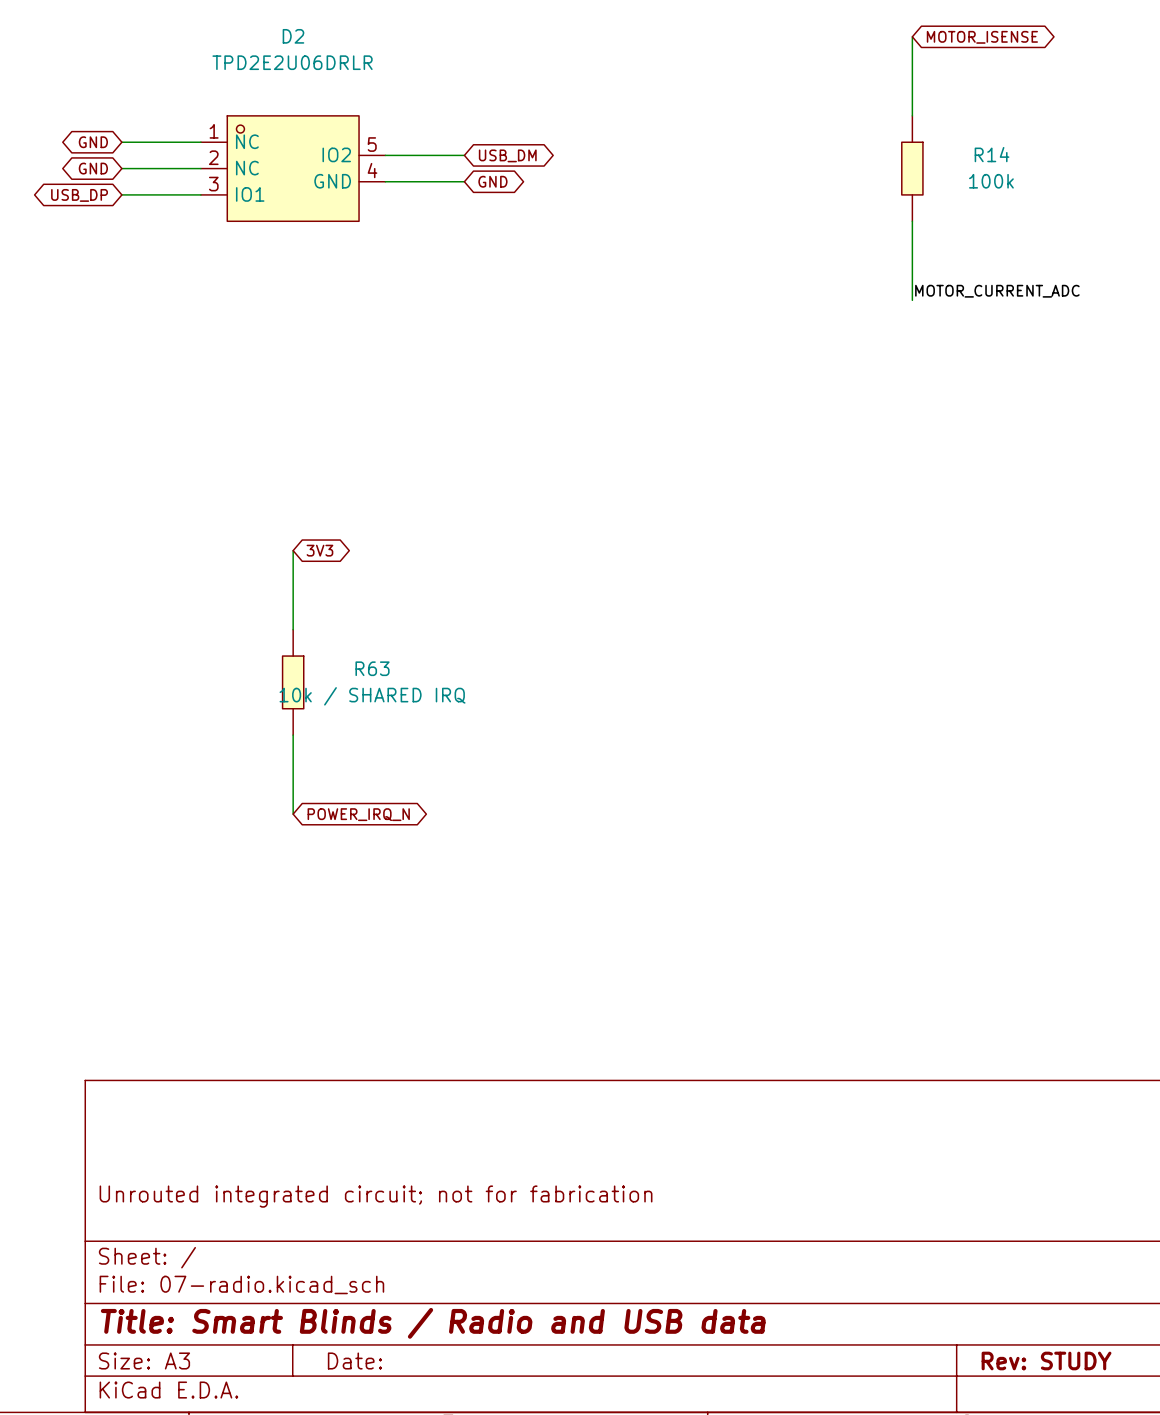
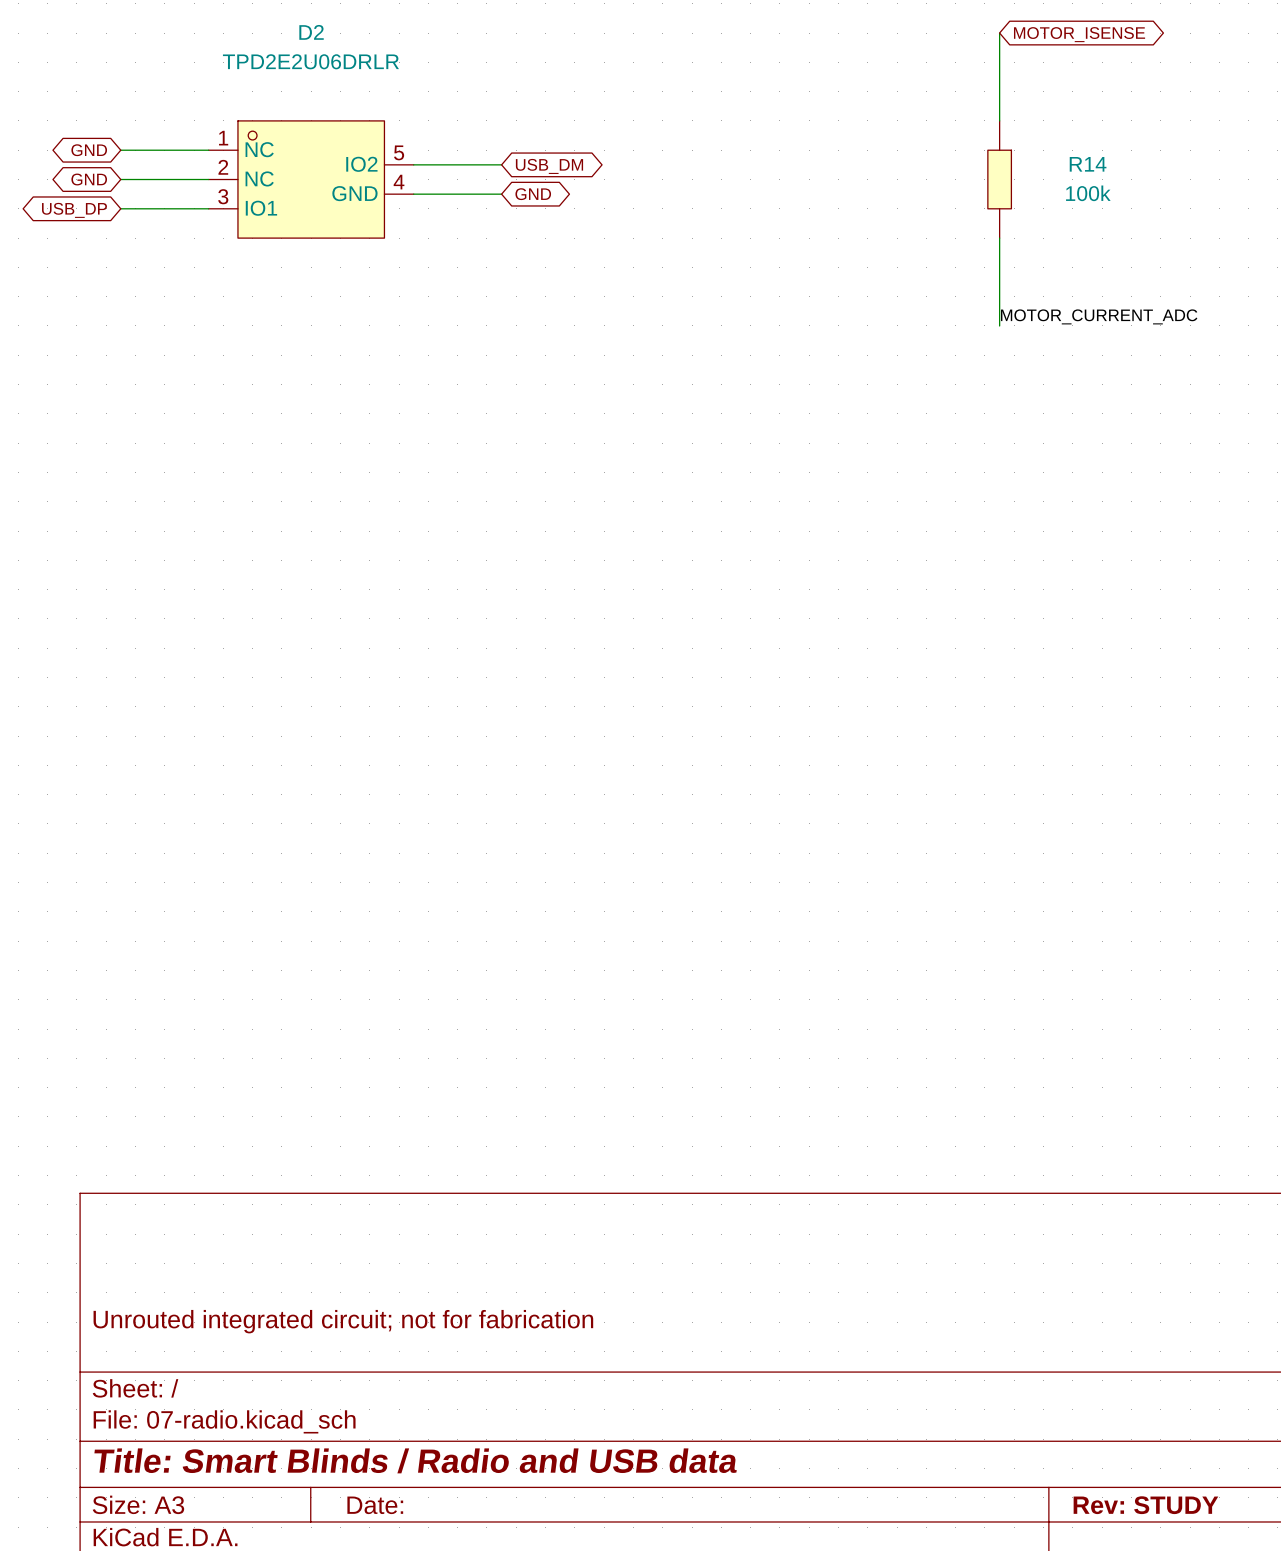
wire: (293, 550) (293, 629) -> none
global label: 3V3 (319, 550) -> none
R63: 10k / SHARED IRQ (293, 682) -> none
wire: (293, 735) (293, 814) -> none
global label: POWER_IRQ_N (358, 814) -> none

